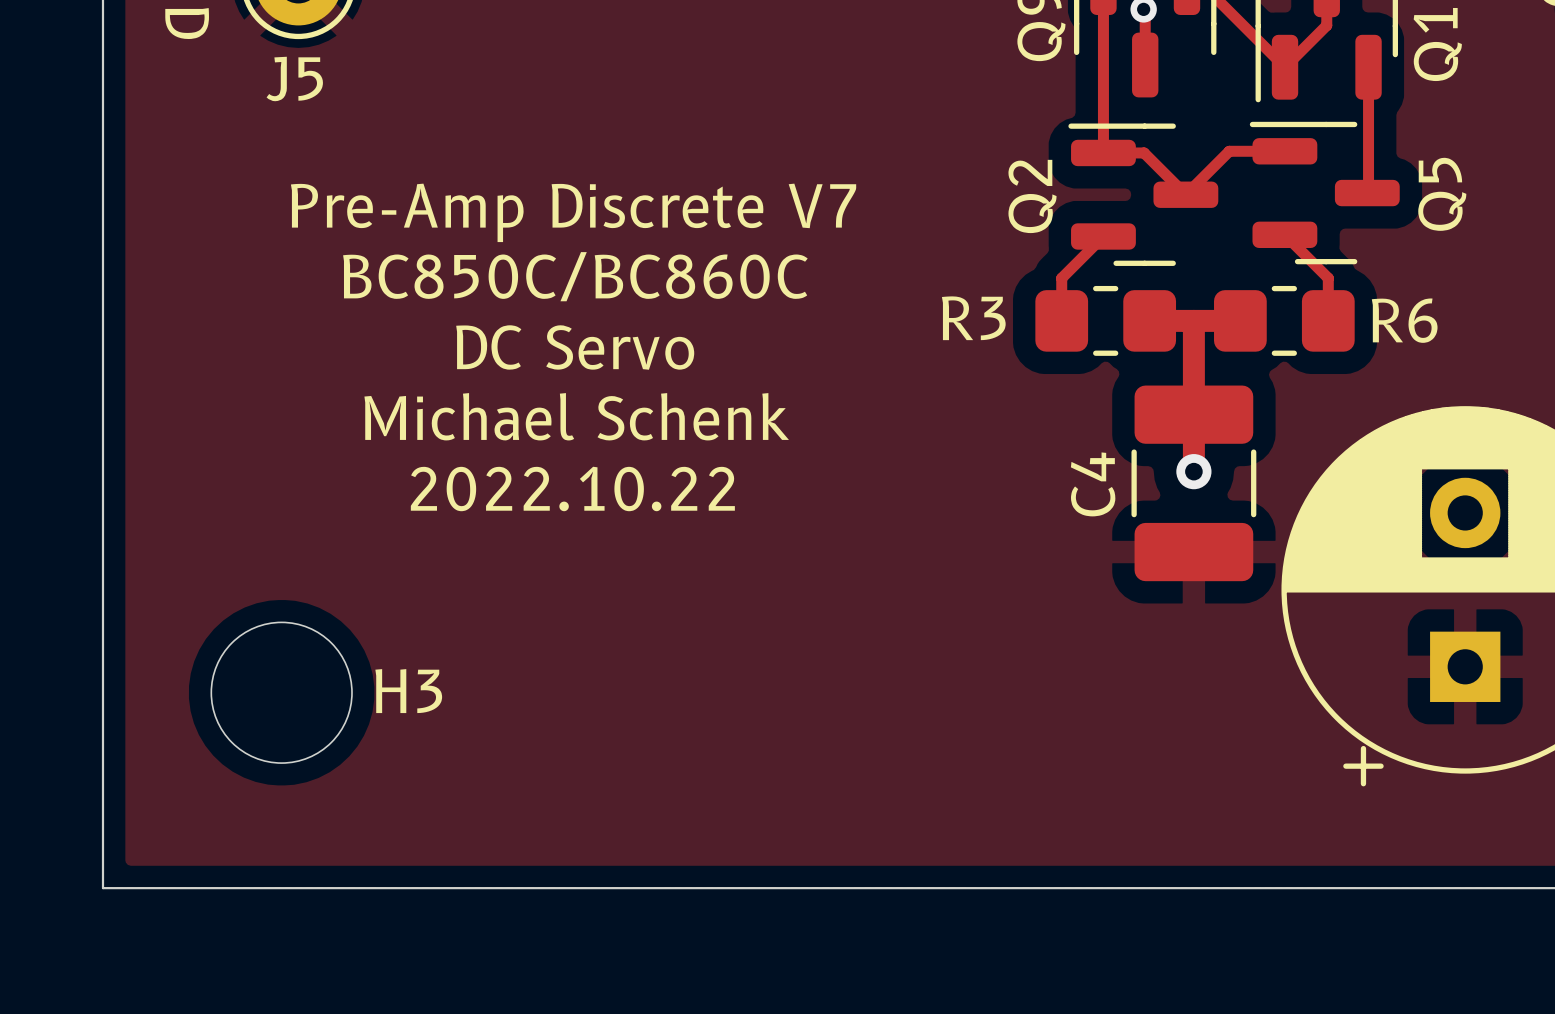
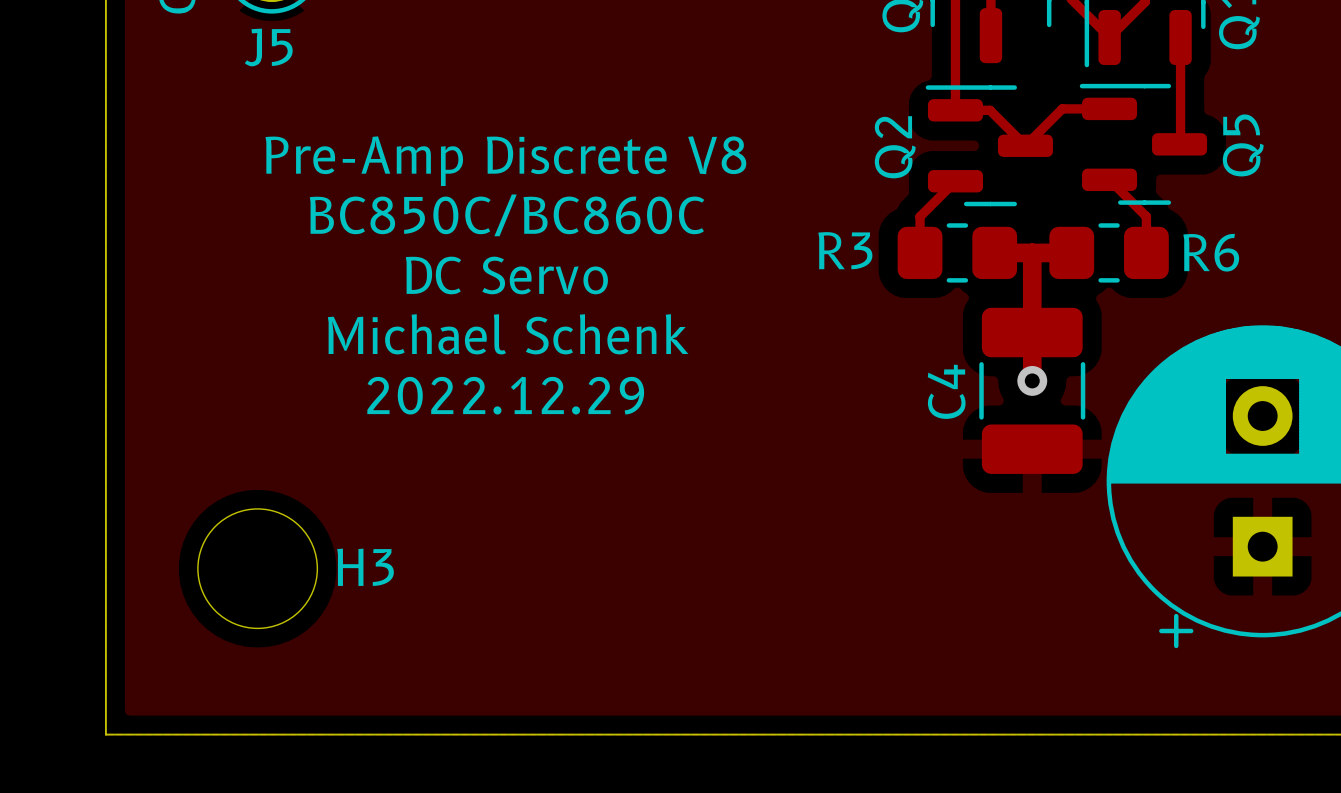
text: Pre-Amp Discrete V7 (573, 212) -> Pre-Amp Discrete V8 (505, 161)
text: 2022.10.22 (572, 488) -> 2022.12.29 (505, 395)

